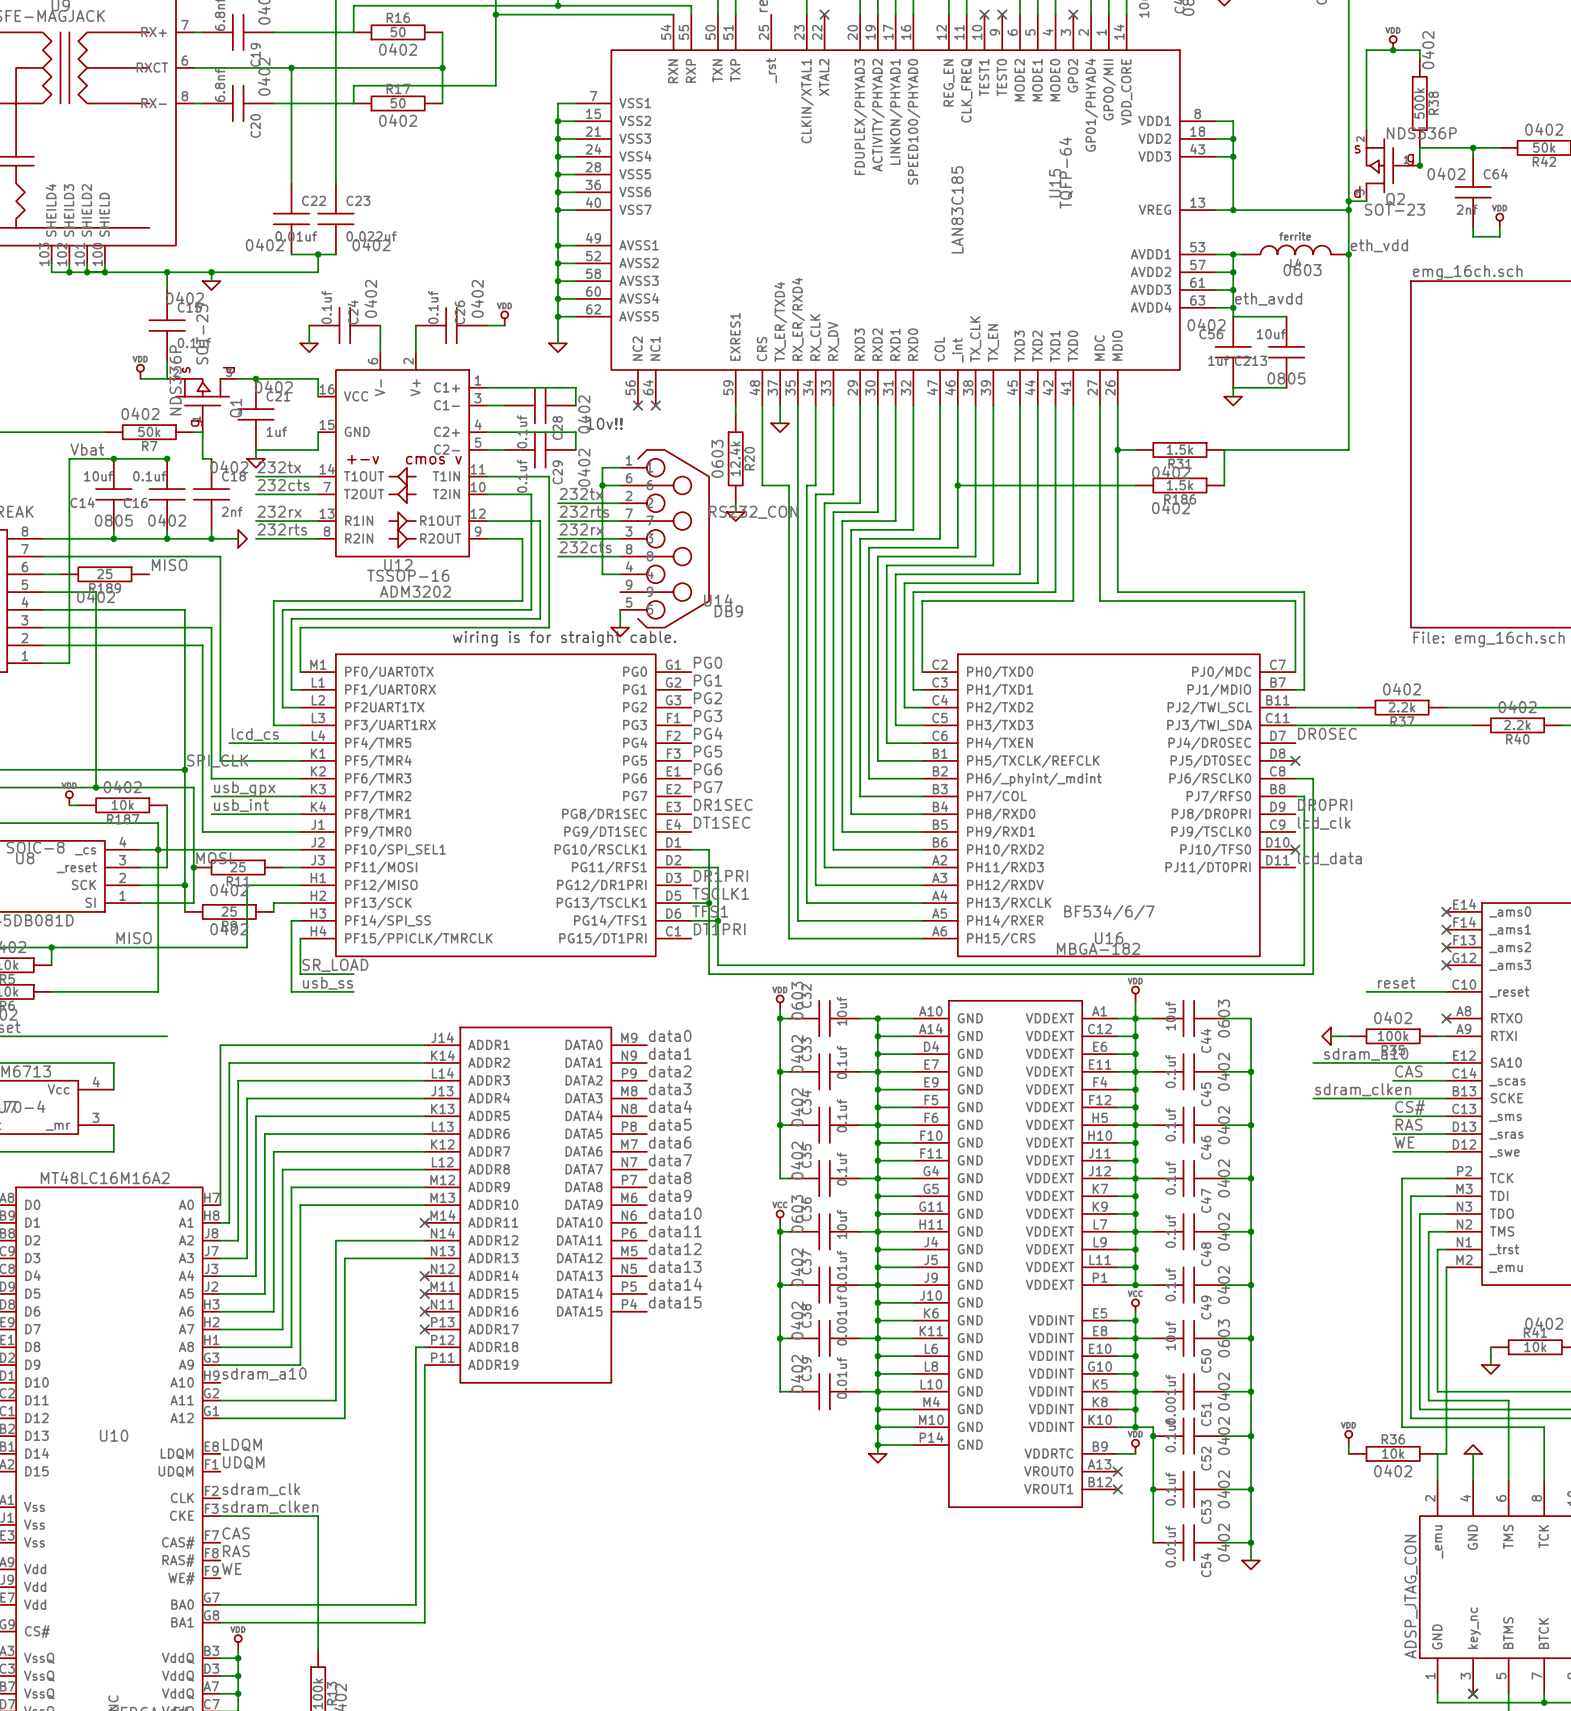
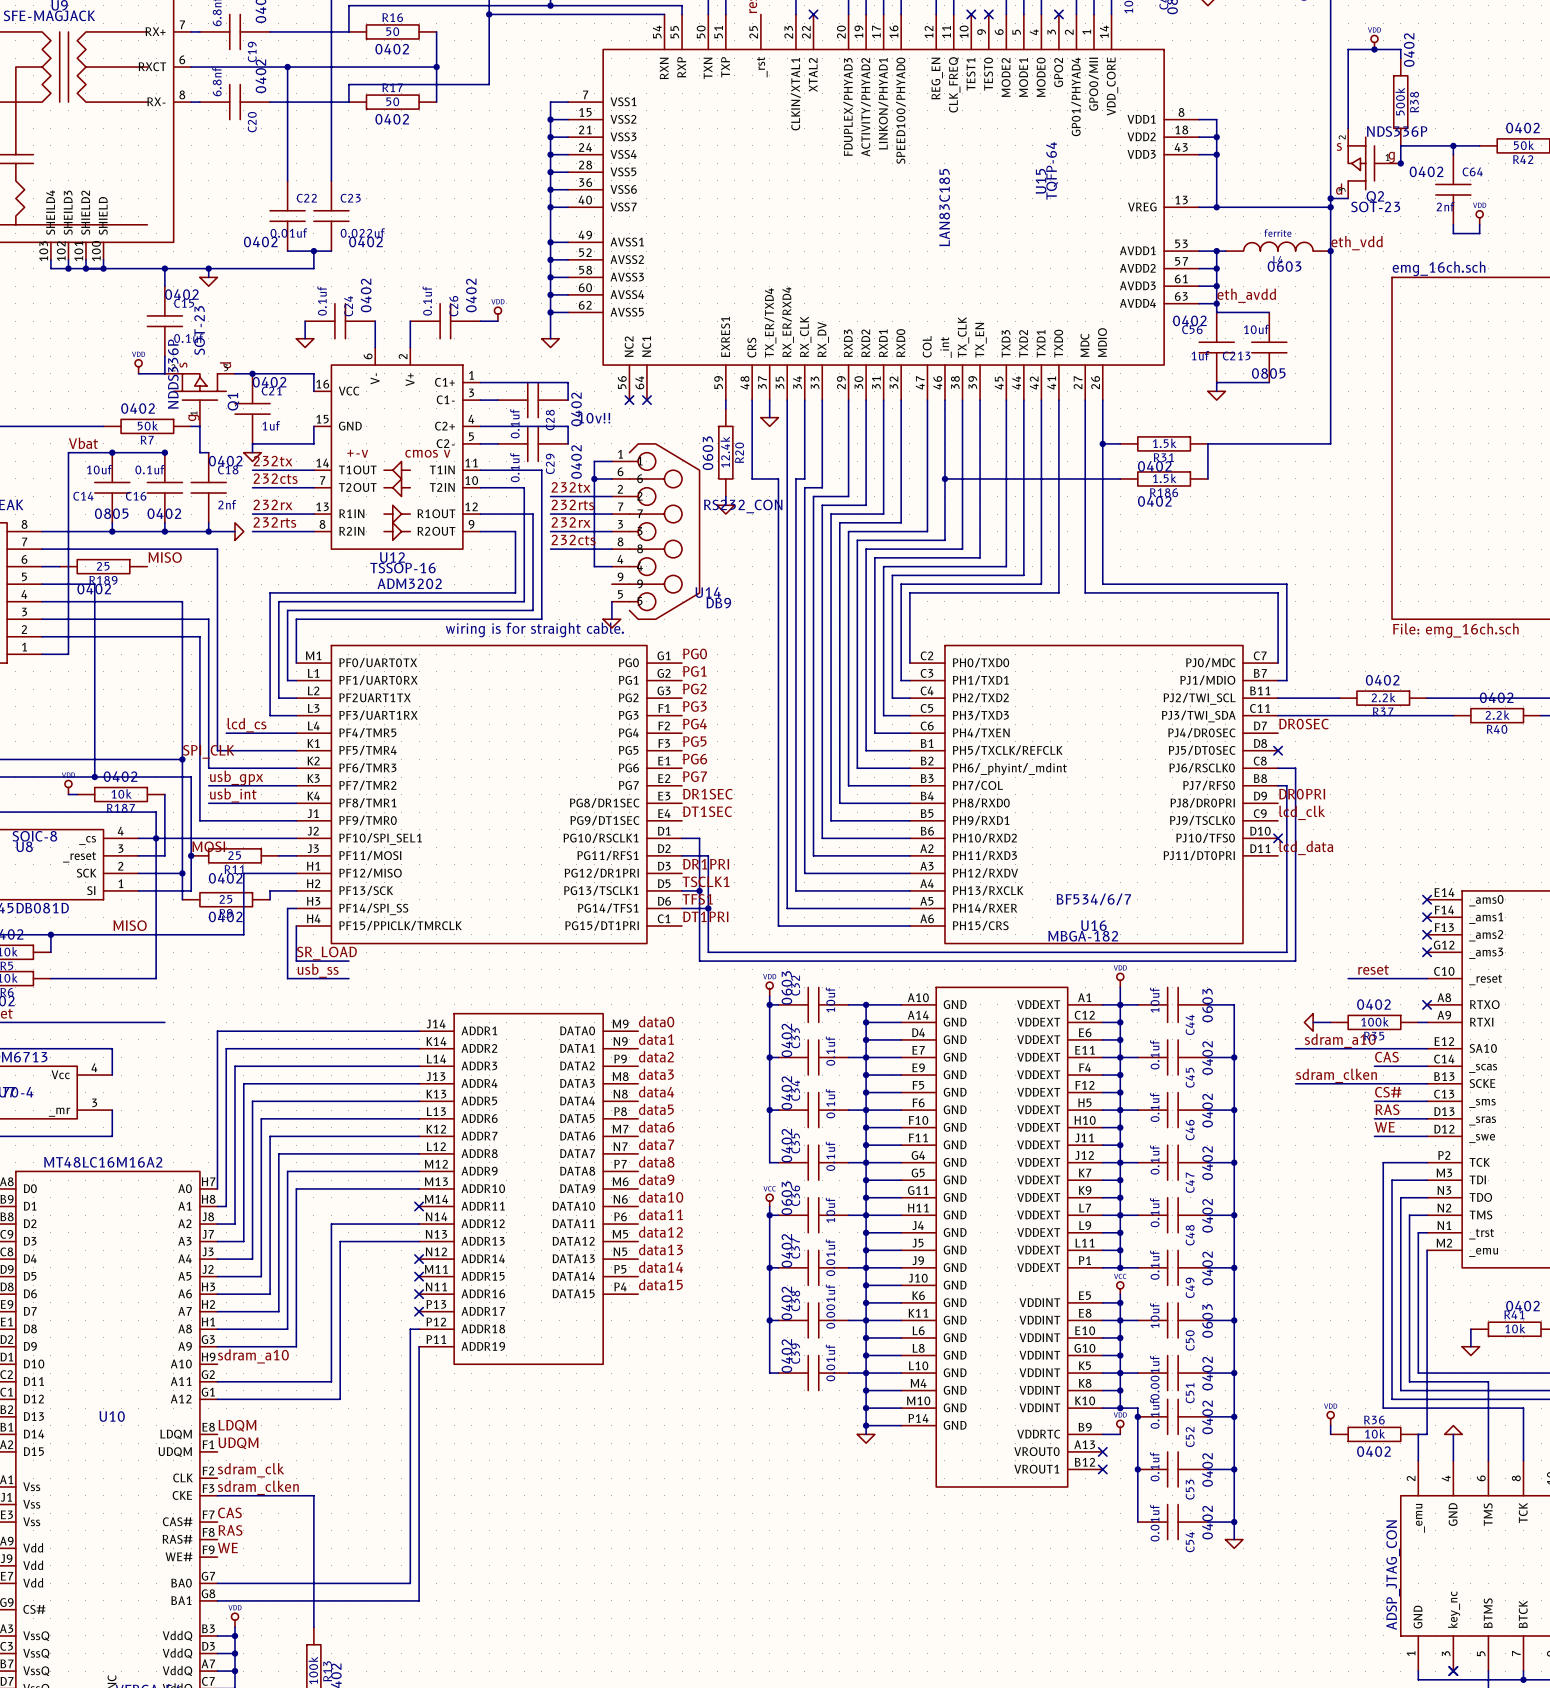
Q1 value: NDS336P (175, 380) -> NDDS336P (173, 374)

